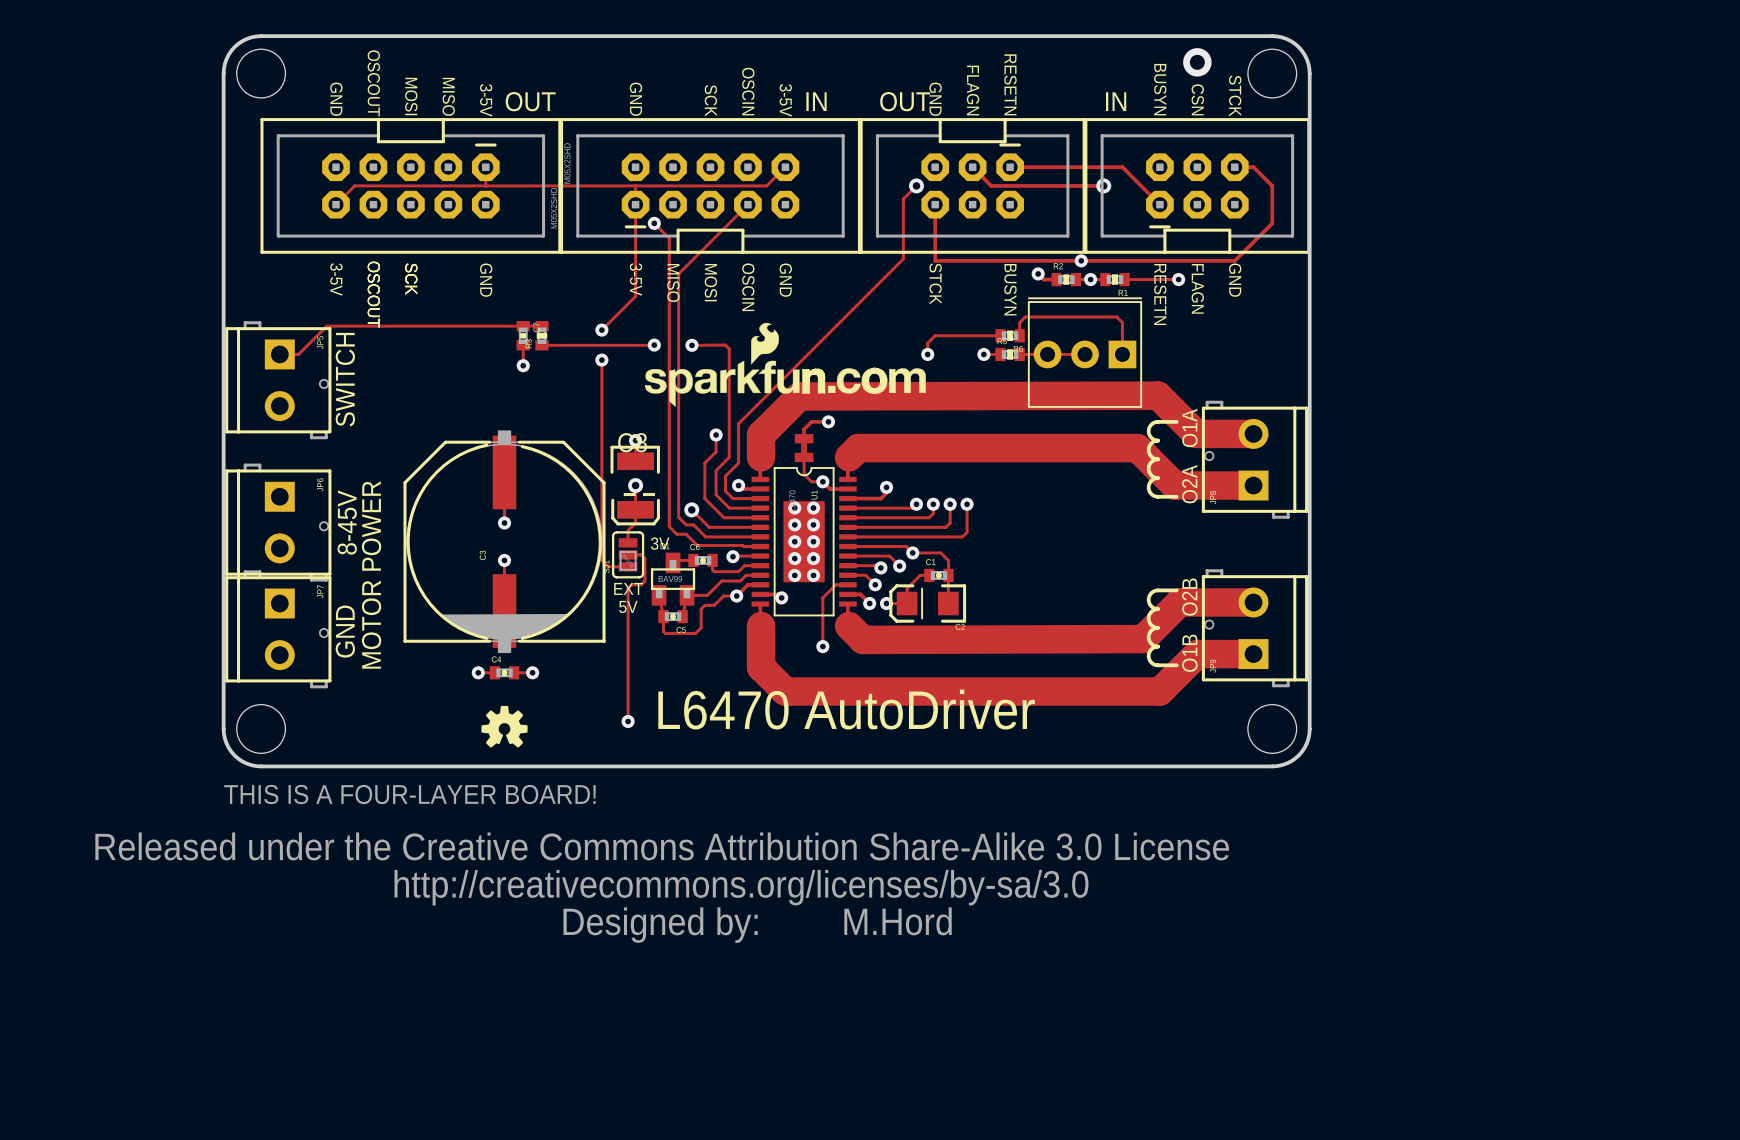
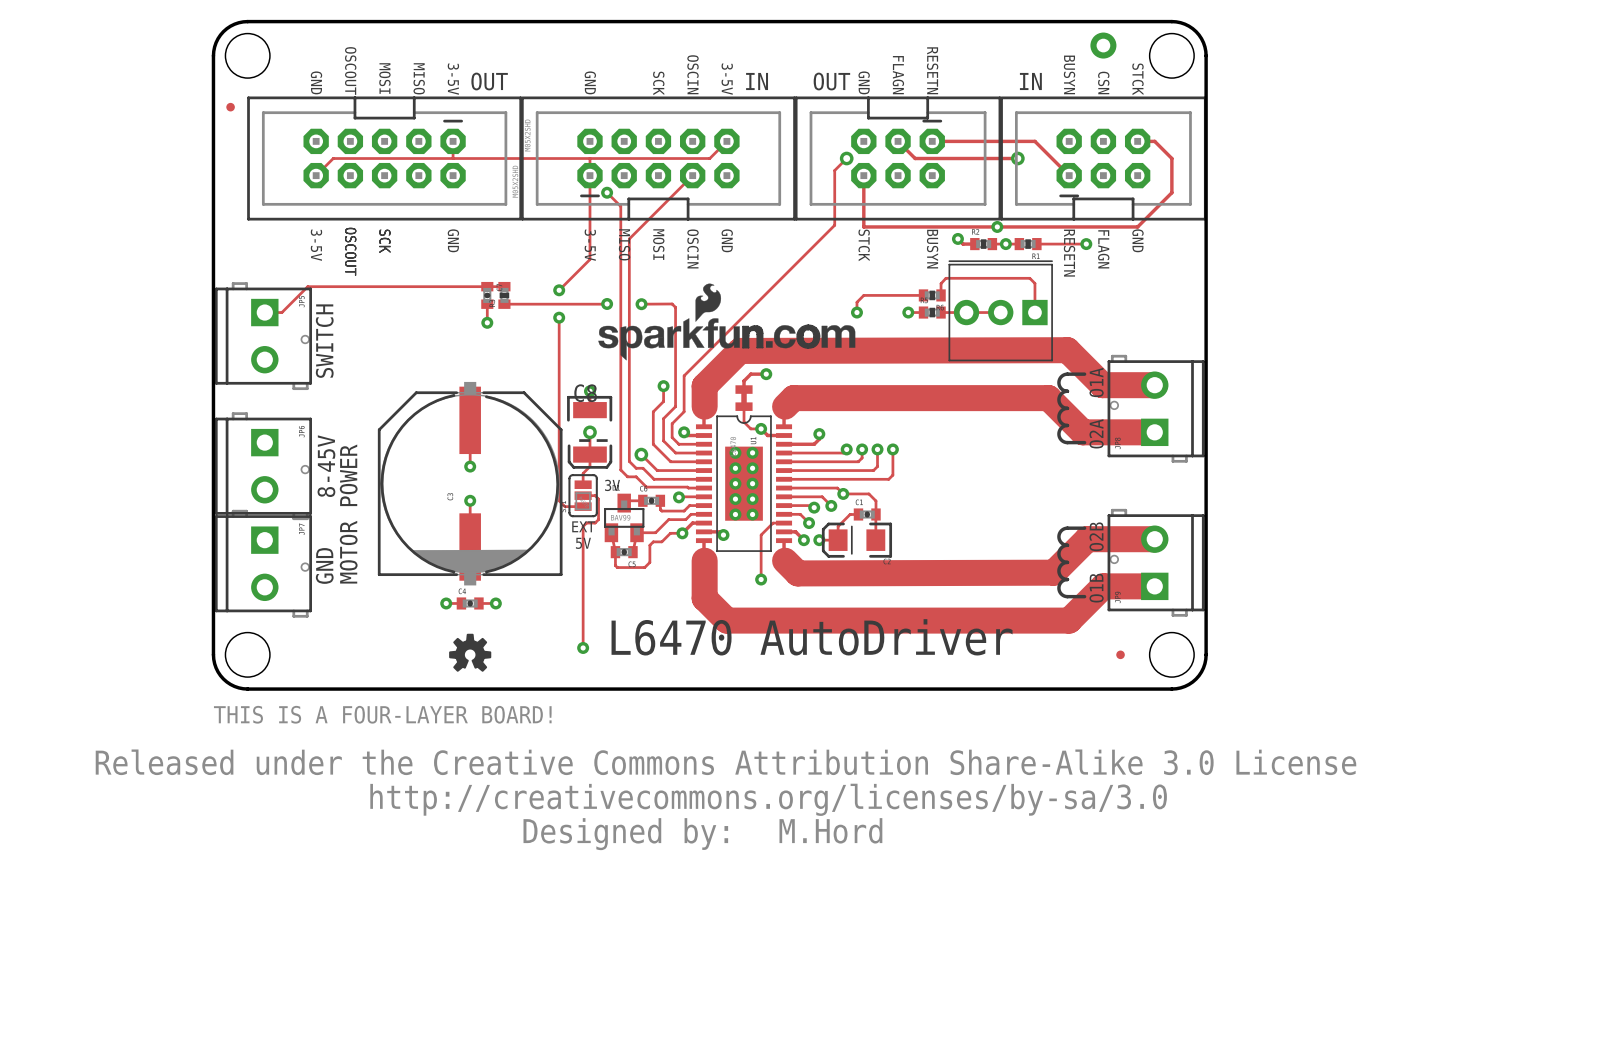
part: none -> (230, 107)
part: none -> (1120, 654)

